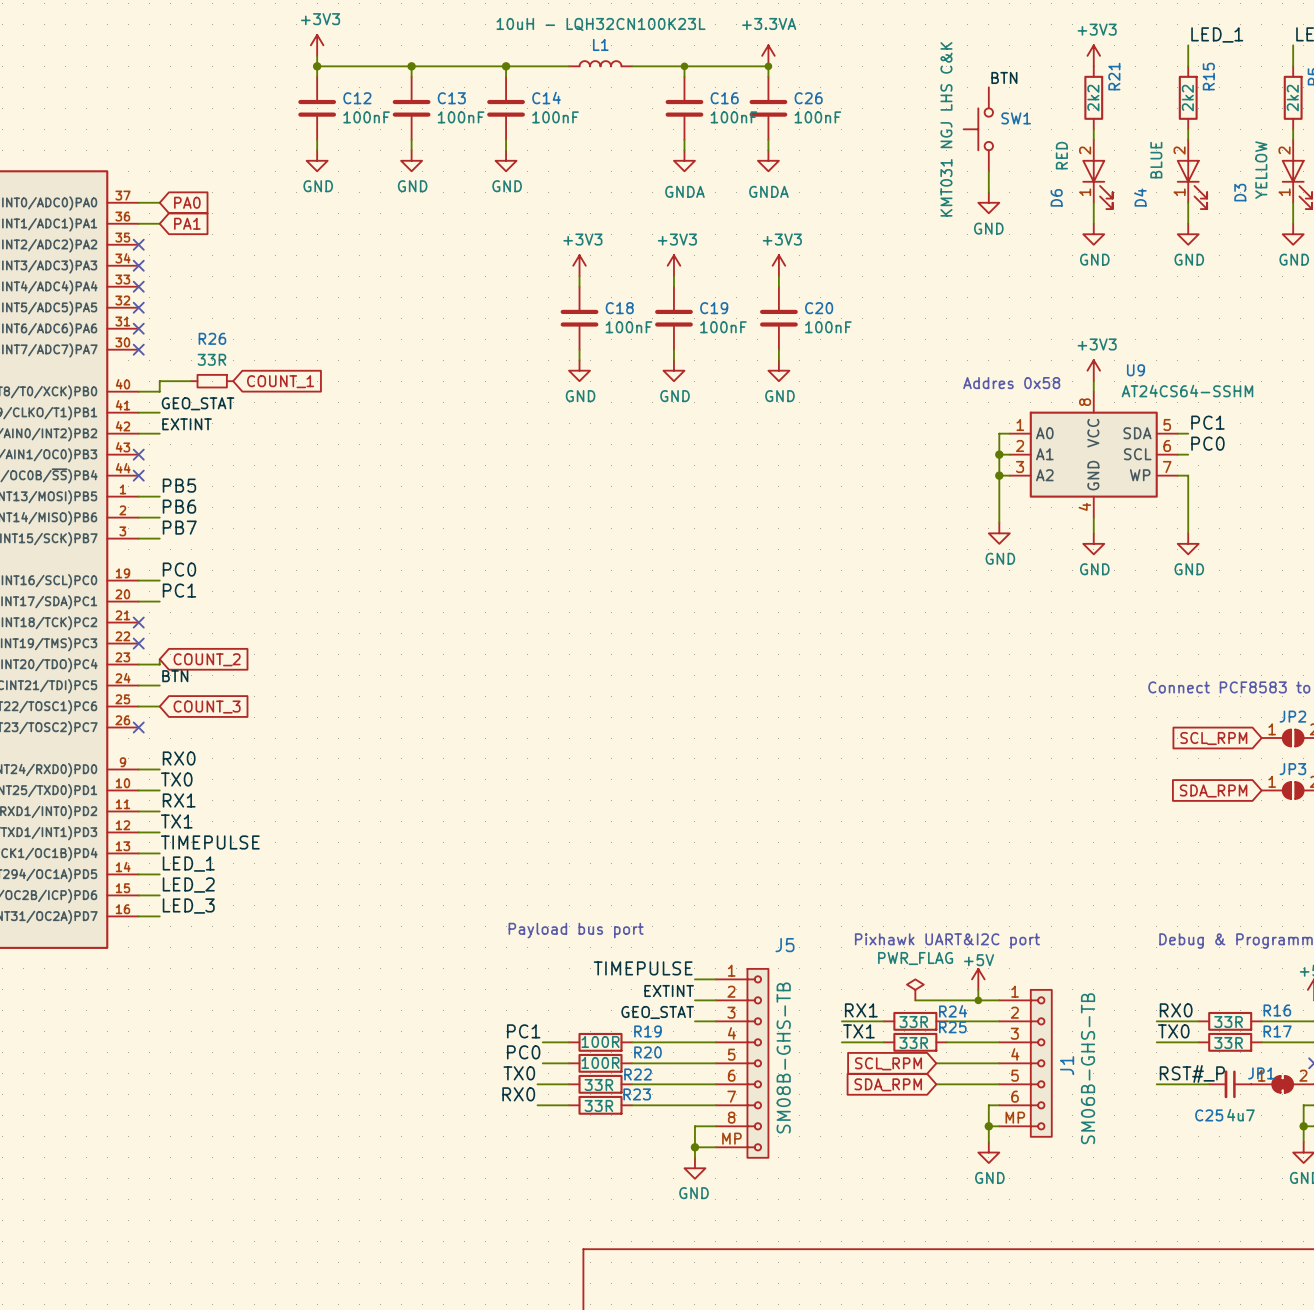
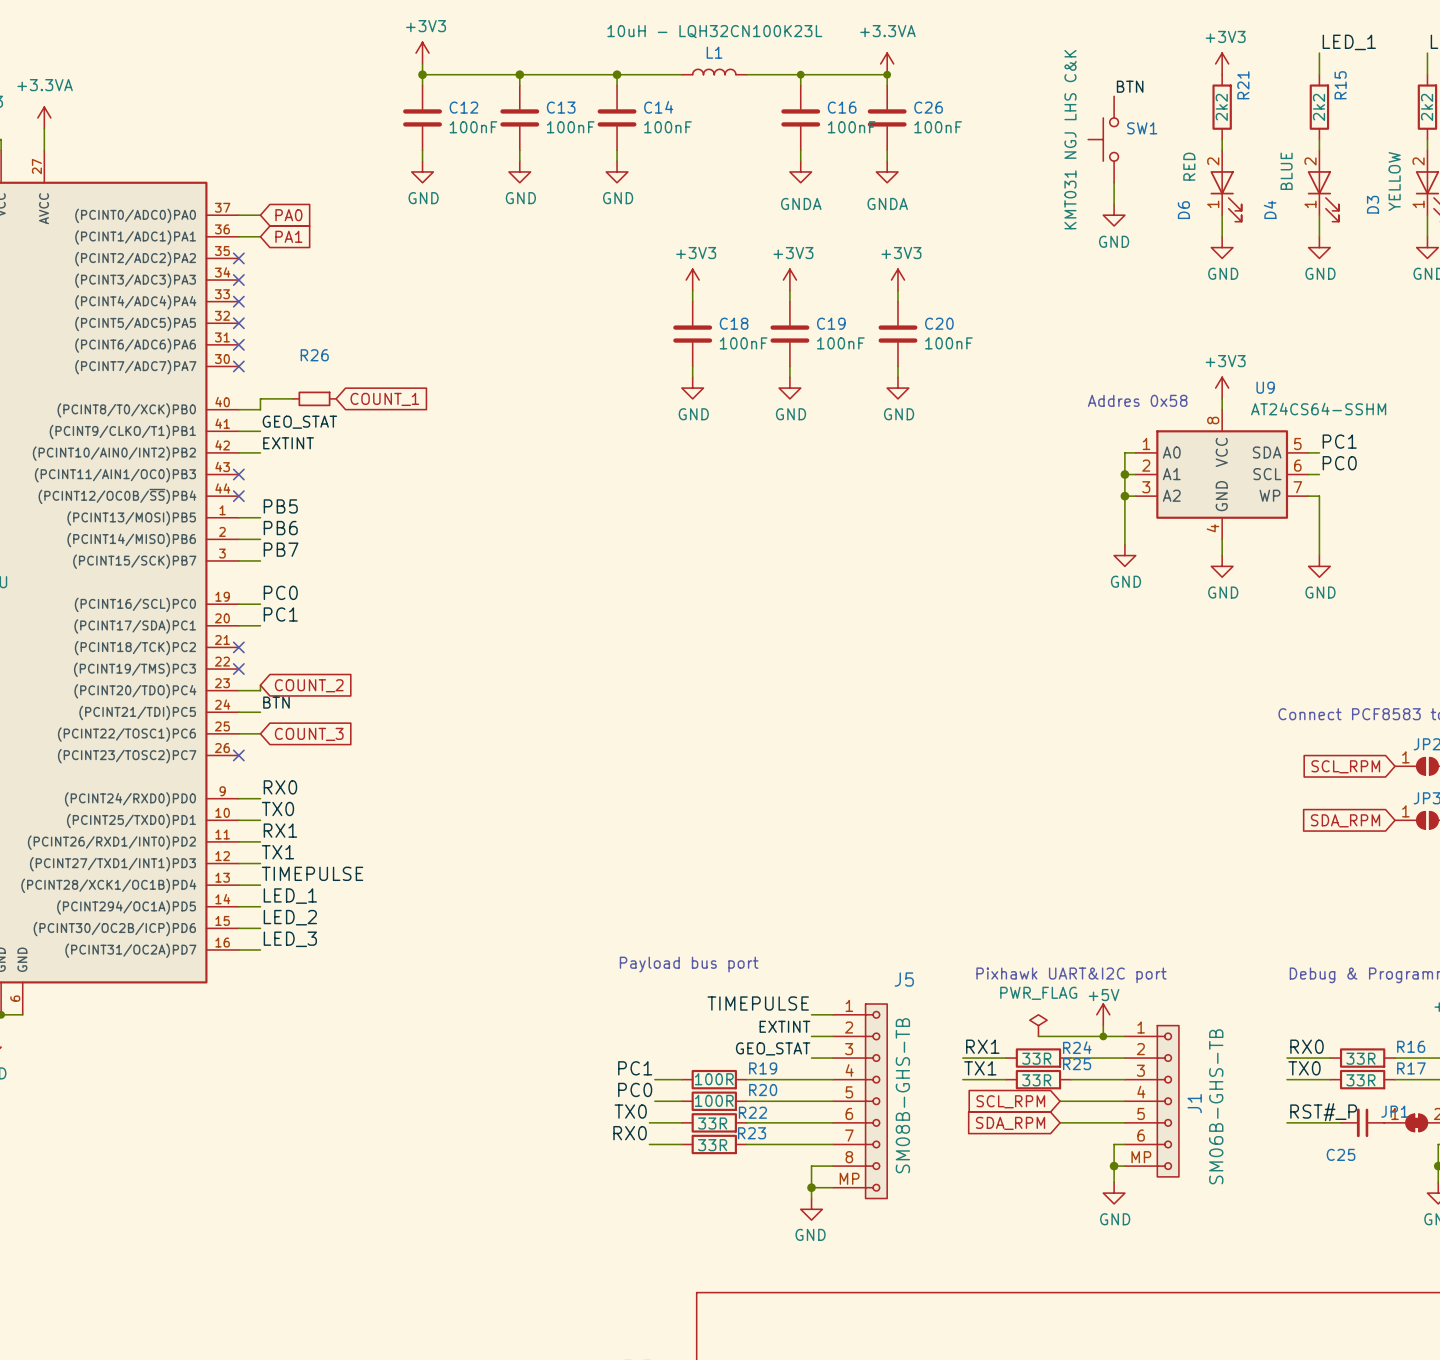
R26 value: 33R (211, 359) -> none
C25 value: 4u7 (1240, 1115) -> none

